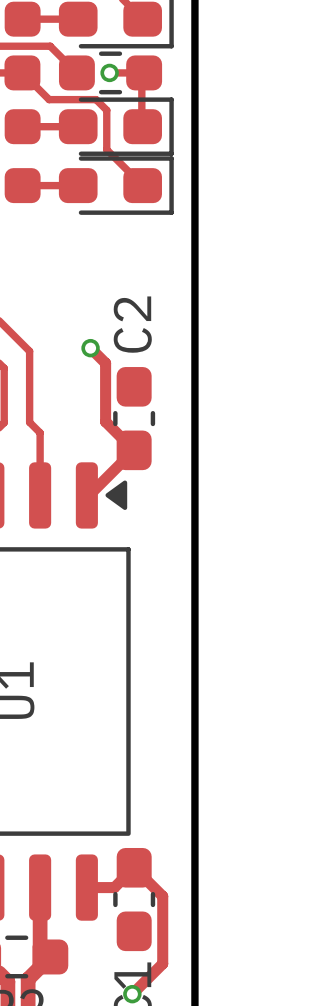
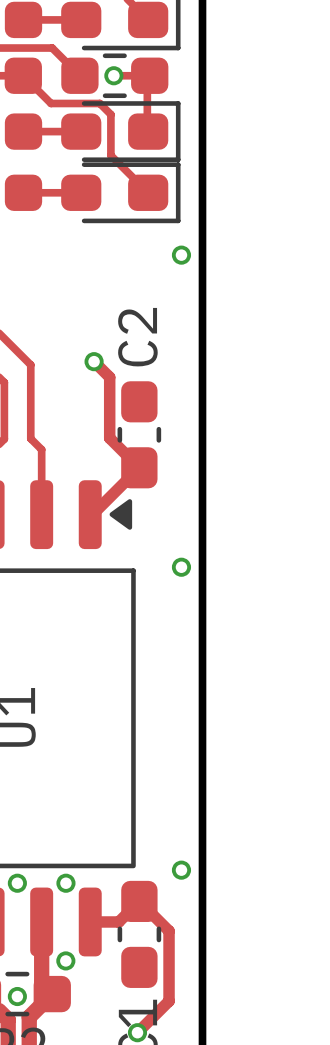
via: none -> (181, 255)
via: none -> (181, 567)
via: none -> (181, 870)
via: none -> (17, 883)
via: none -> (65, 883)
via: none -> (65, 960)
via: none -> (17, 996)

